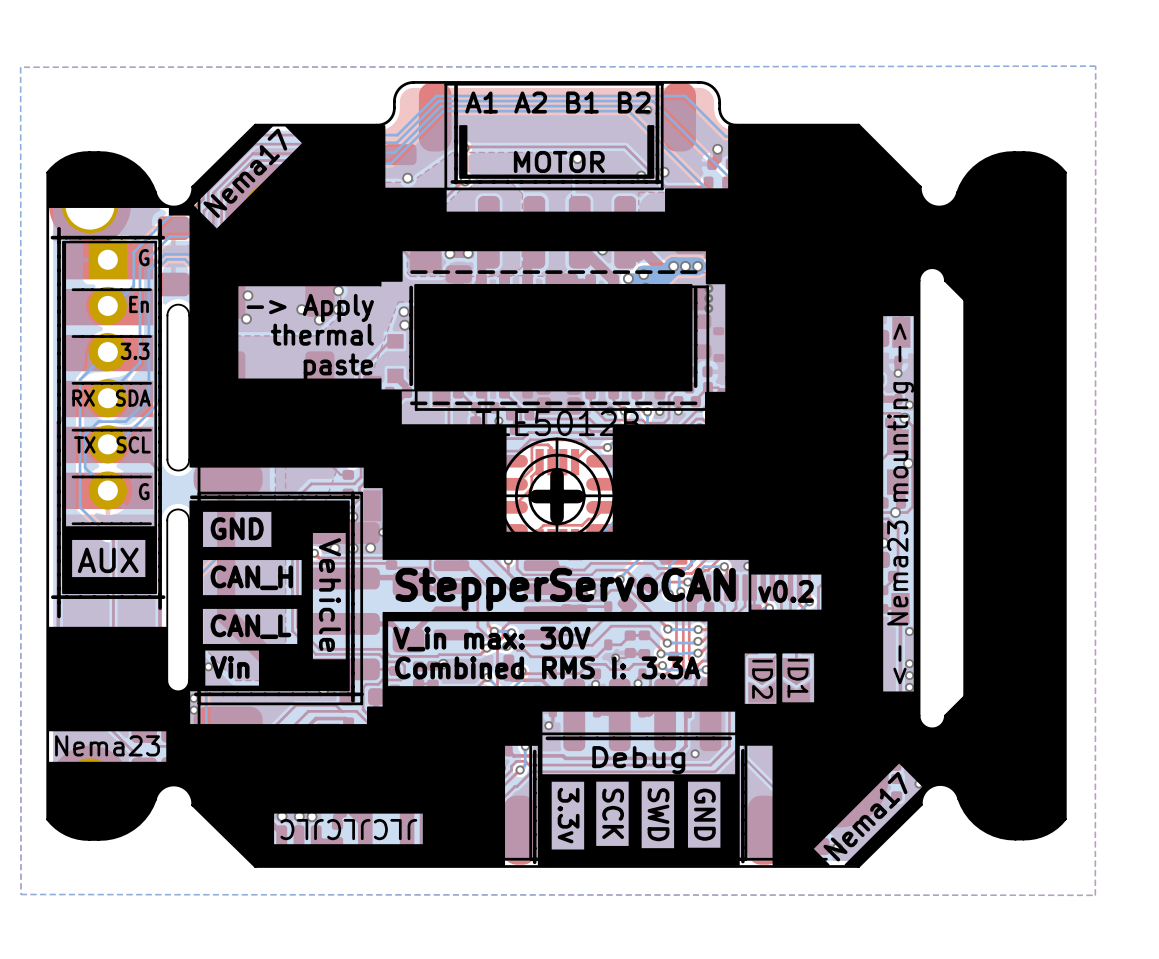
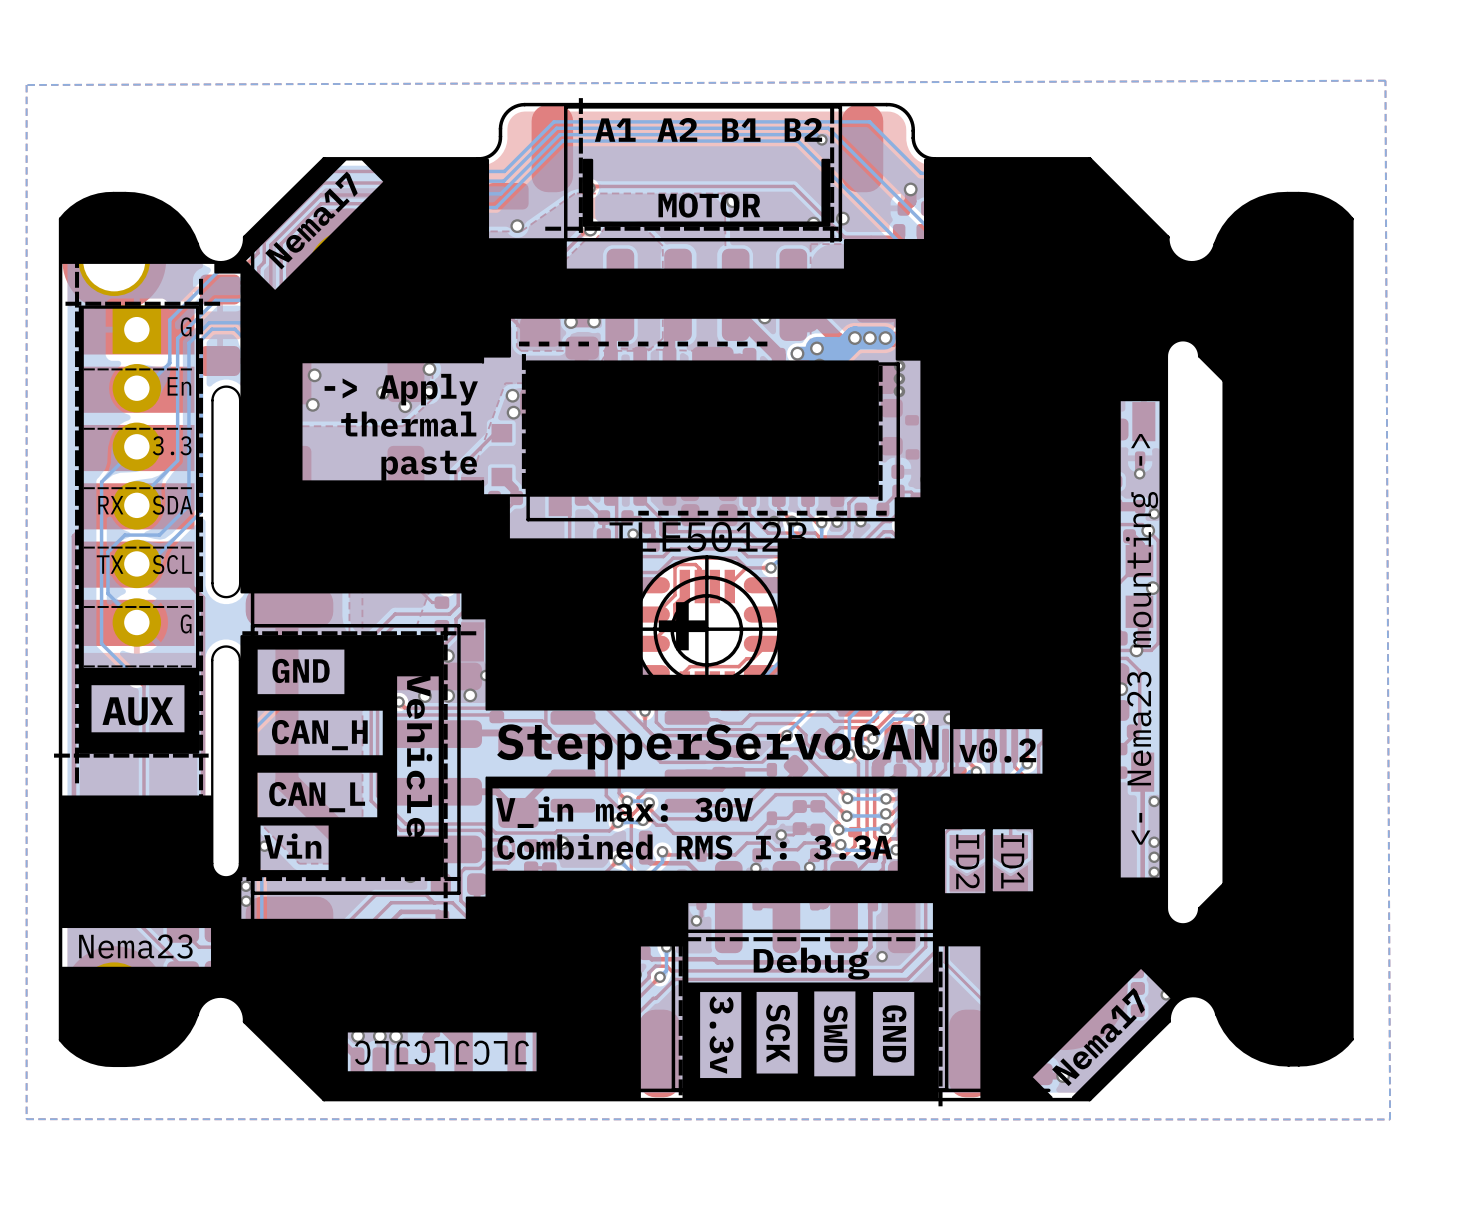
bottom zone outline: (1095, 66) (1095, 895) (20, 894) (20, 67) (1095, 66) -> (1385, 80) (1390, 1119) (26, 1119) (26, 84) (1385, 80)

